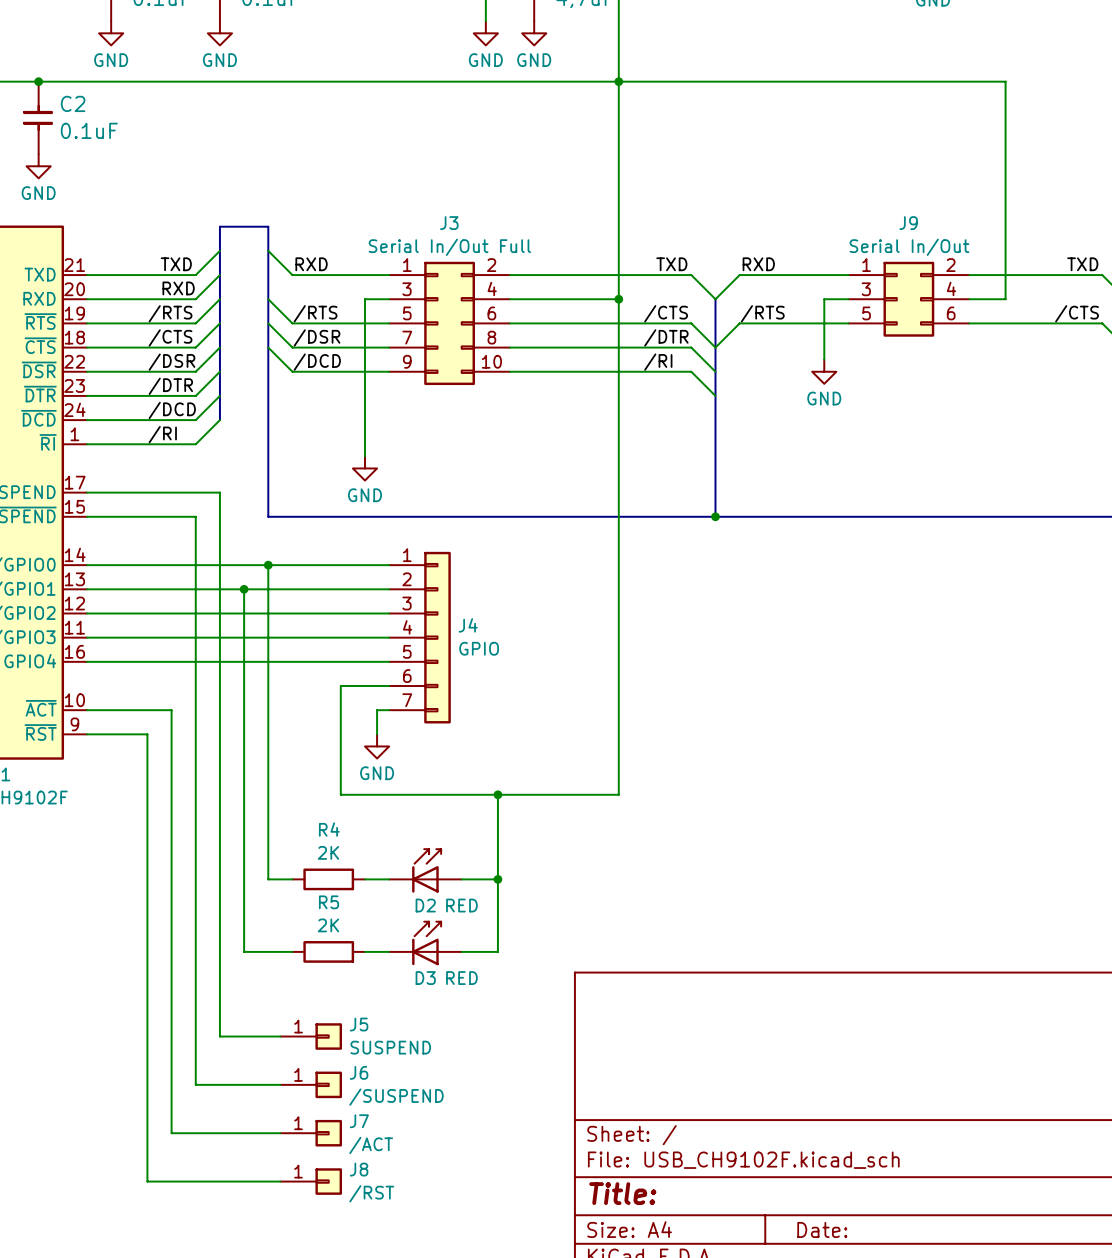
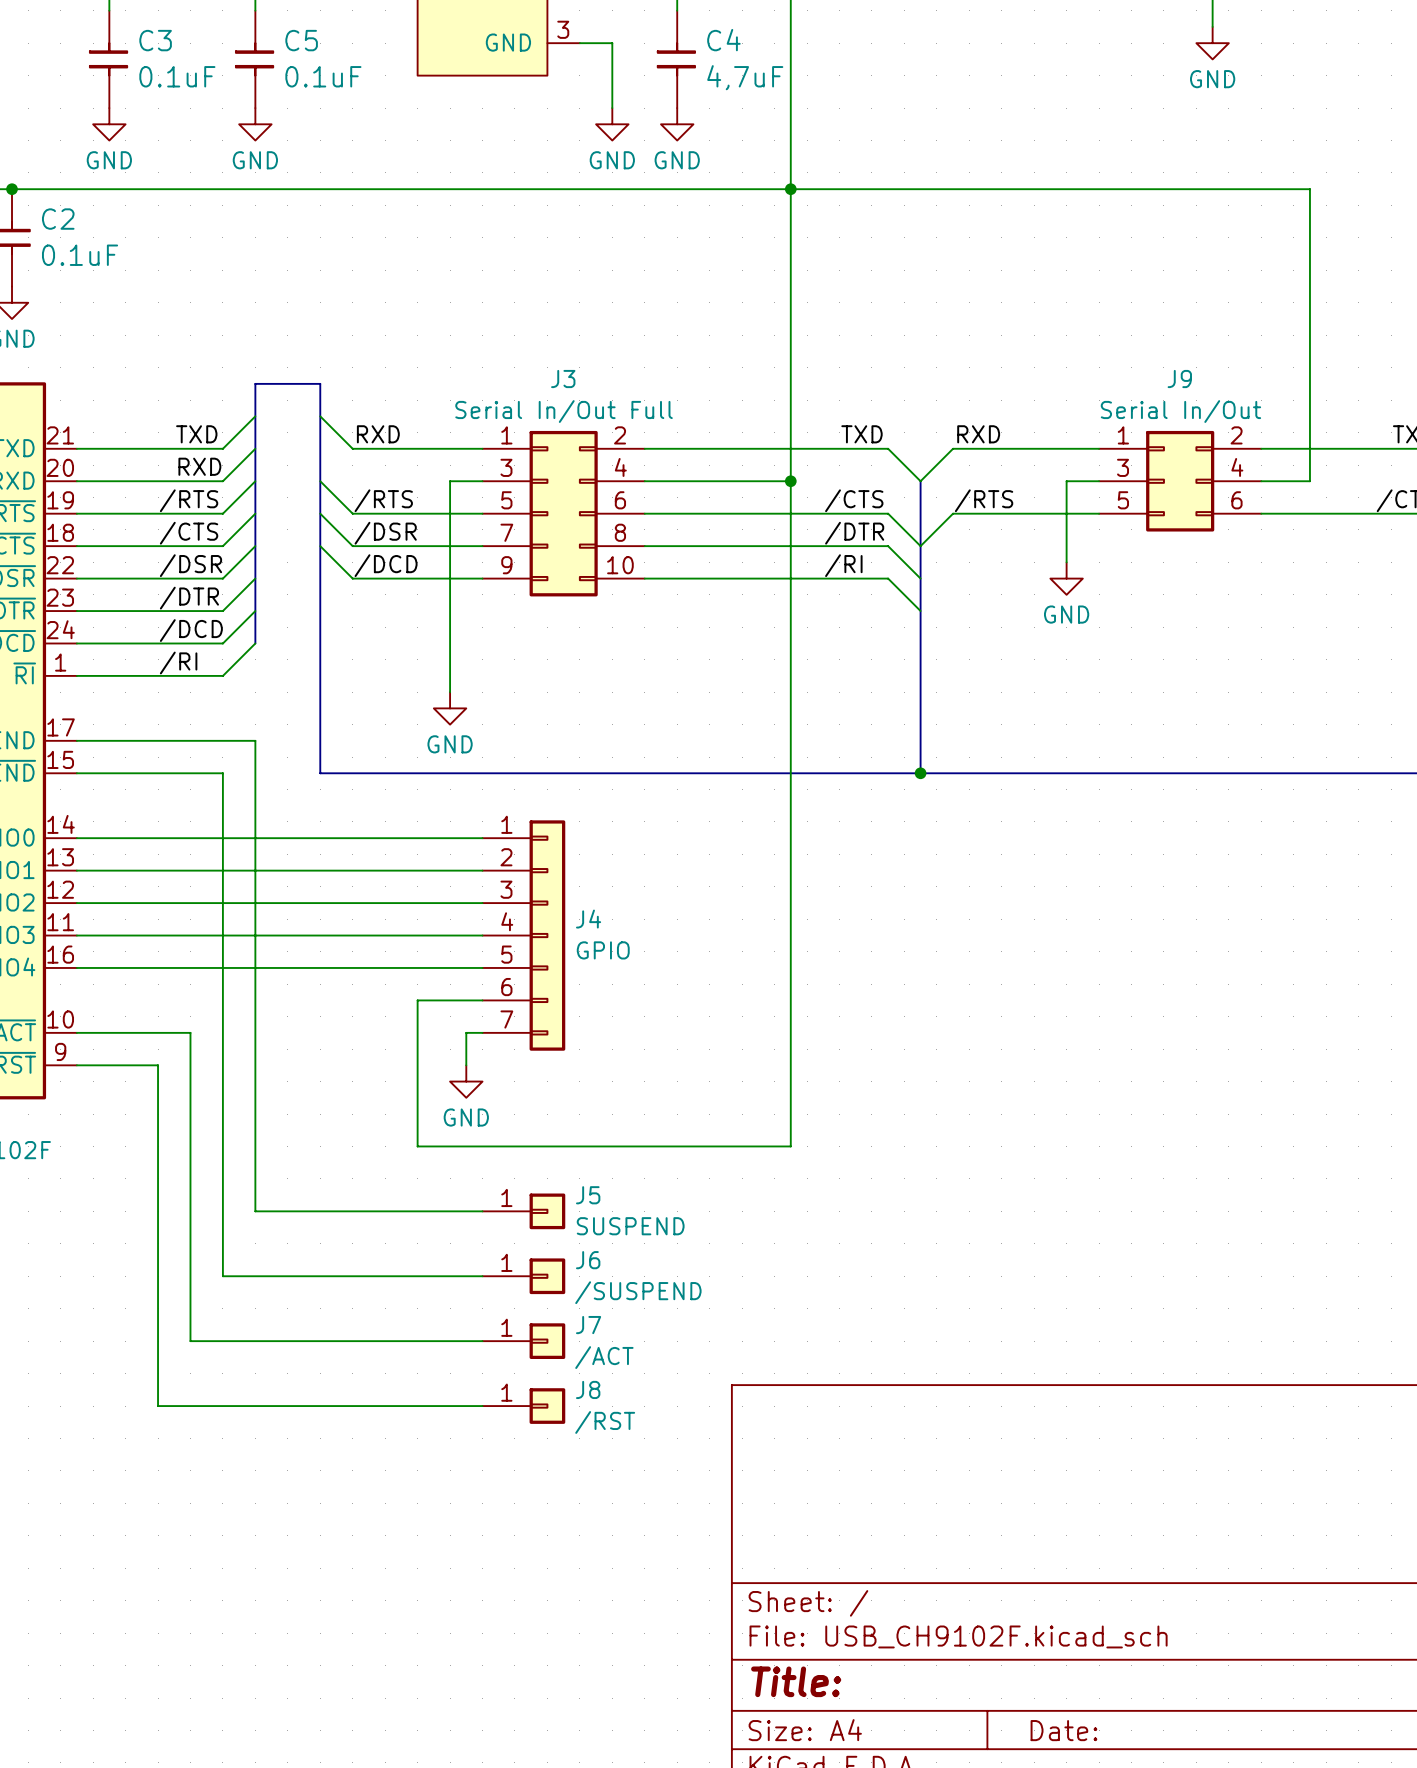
wire: (268, 565) (268, 879) (292, 879) -> none
junction: (268, 565) -> none
wire: (244, 589) (244, 951) (292, 951) -> none
junction: (244, 589) -> none
wire: (497, 794) (497, 951) (461, 951) -> none
junction: (497, 794) -> none
wire: (219, 843) (219, 1036) (280, 1036) -> (255, 1211) (482, 1211)
D2: RED (425, 870) -> none
R4: 2K (328, 879) -> none
wire: (364, 879) (389, 879) -> none
wire: (461, 879) (497, 879) -> none
junction: (497, 879) -> none
wire: (195, 891) (195, 1084) (280, 1084) -> (222, 1276) (482, 1276)
wire: (171, 939) (171, 1133) (280, 1133) -> (190, 1341) (482, 1341)
D3: RED (425, 943) -> none
R5: 2K (328, 951) -> none
wire: (364, 951) (389, 951) -> none
wire: (147, 988) (147, 1181) (280, 1181) -> (158, 1406) (482, 1406)
J5 position: (311, 1036) -> (523, 1211)
J6 position: (311, 1084) -> (523, 1276)
J7 position: (311, 1133) -> (523, 1341)
J8 position: (311, 1181) -> (523, 1406)

